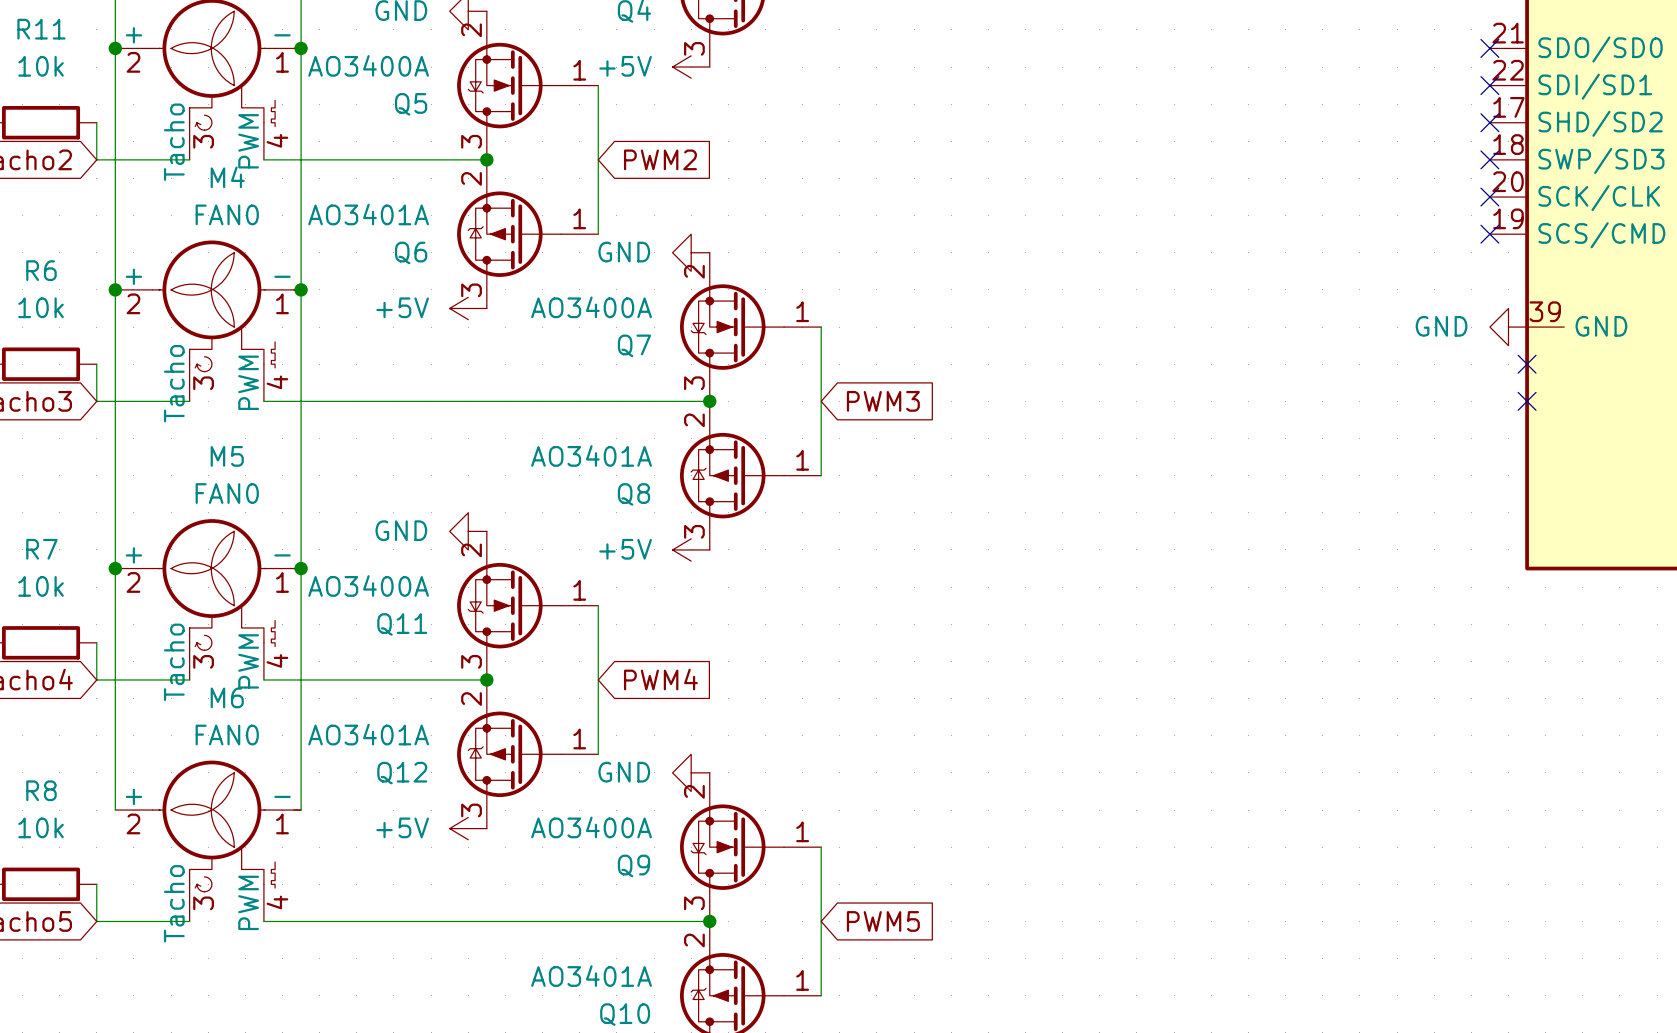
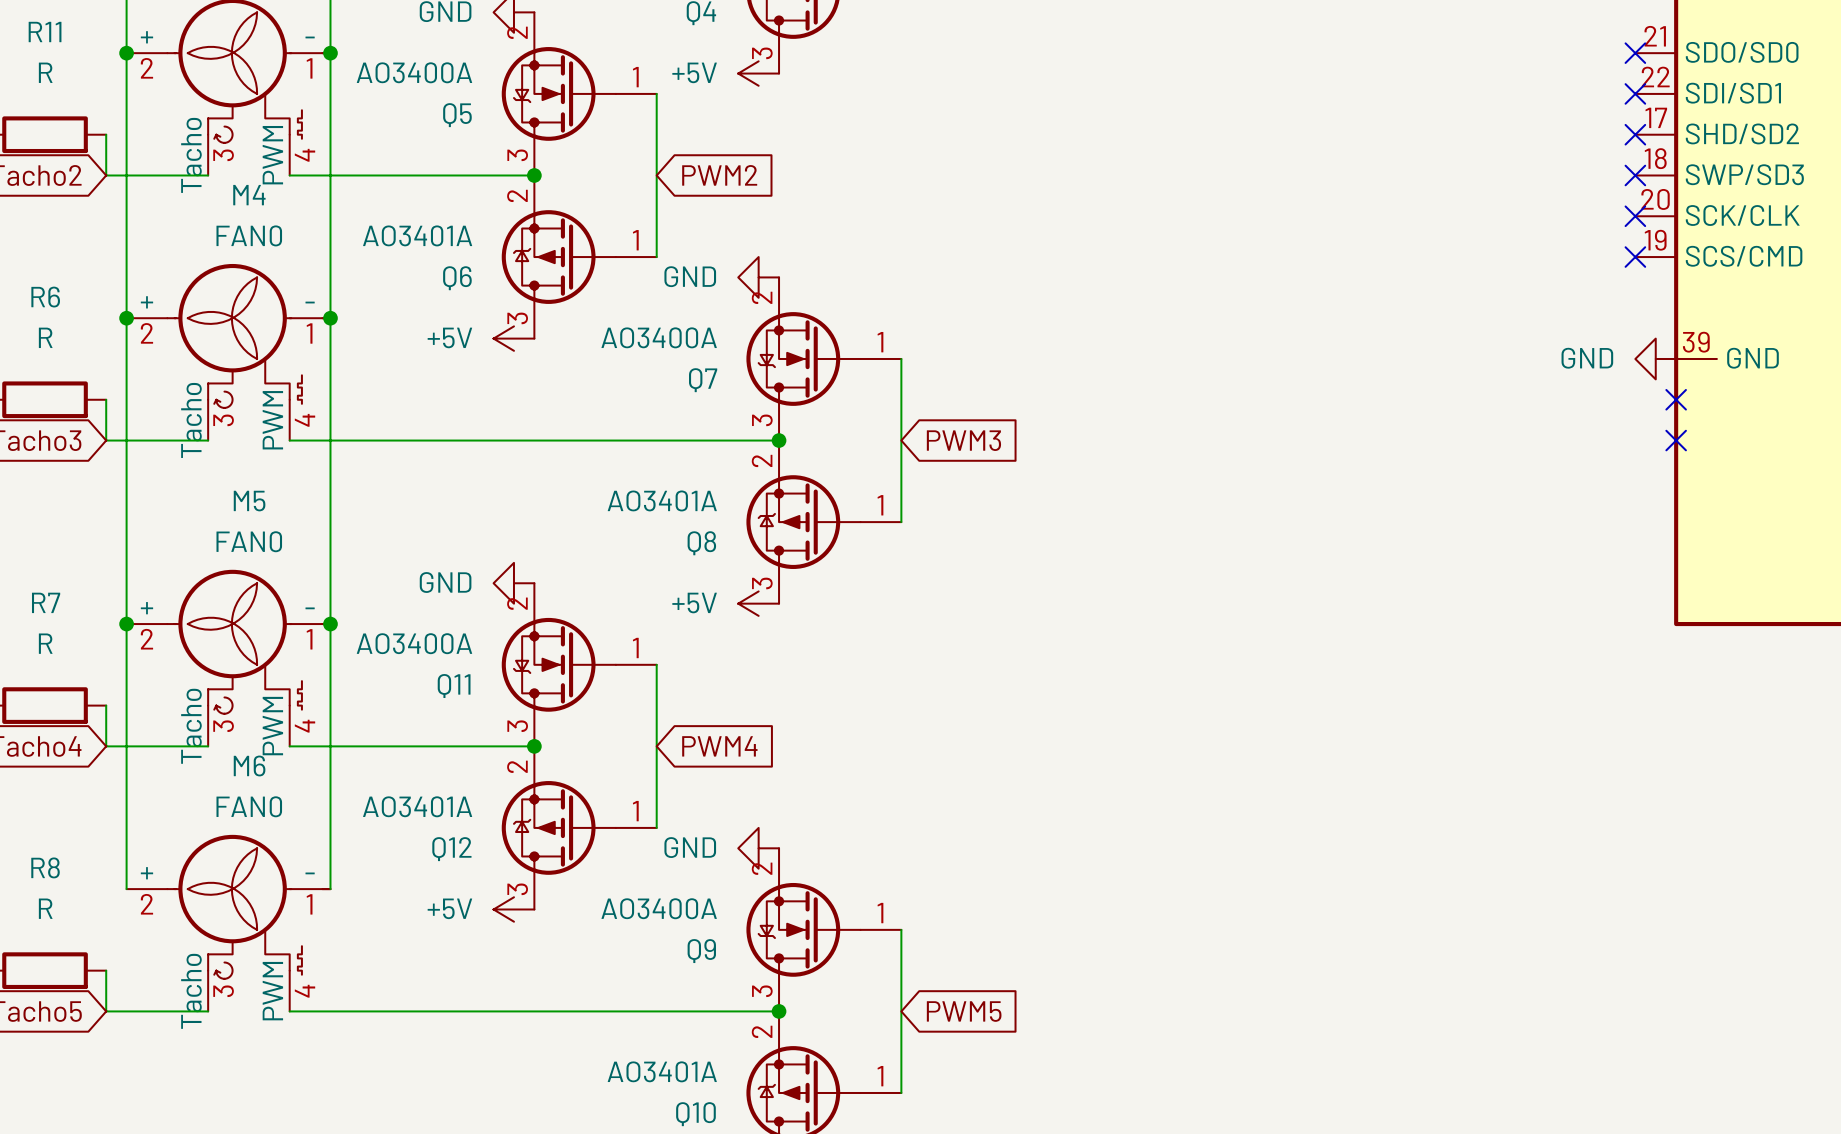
R11 value: 10k (41, 66) -> R (45, 72)
R6 value: 10k (41, 307) -> R (45, 337)
R7 value: 10k (41, 586) -> R (45, 643)
R8 value: 10k (41, 827) -> R (45, 908)

